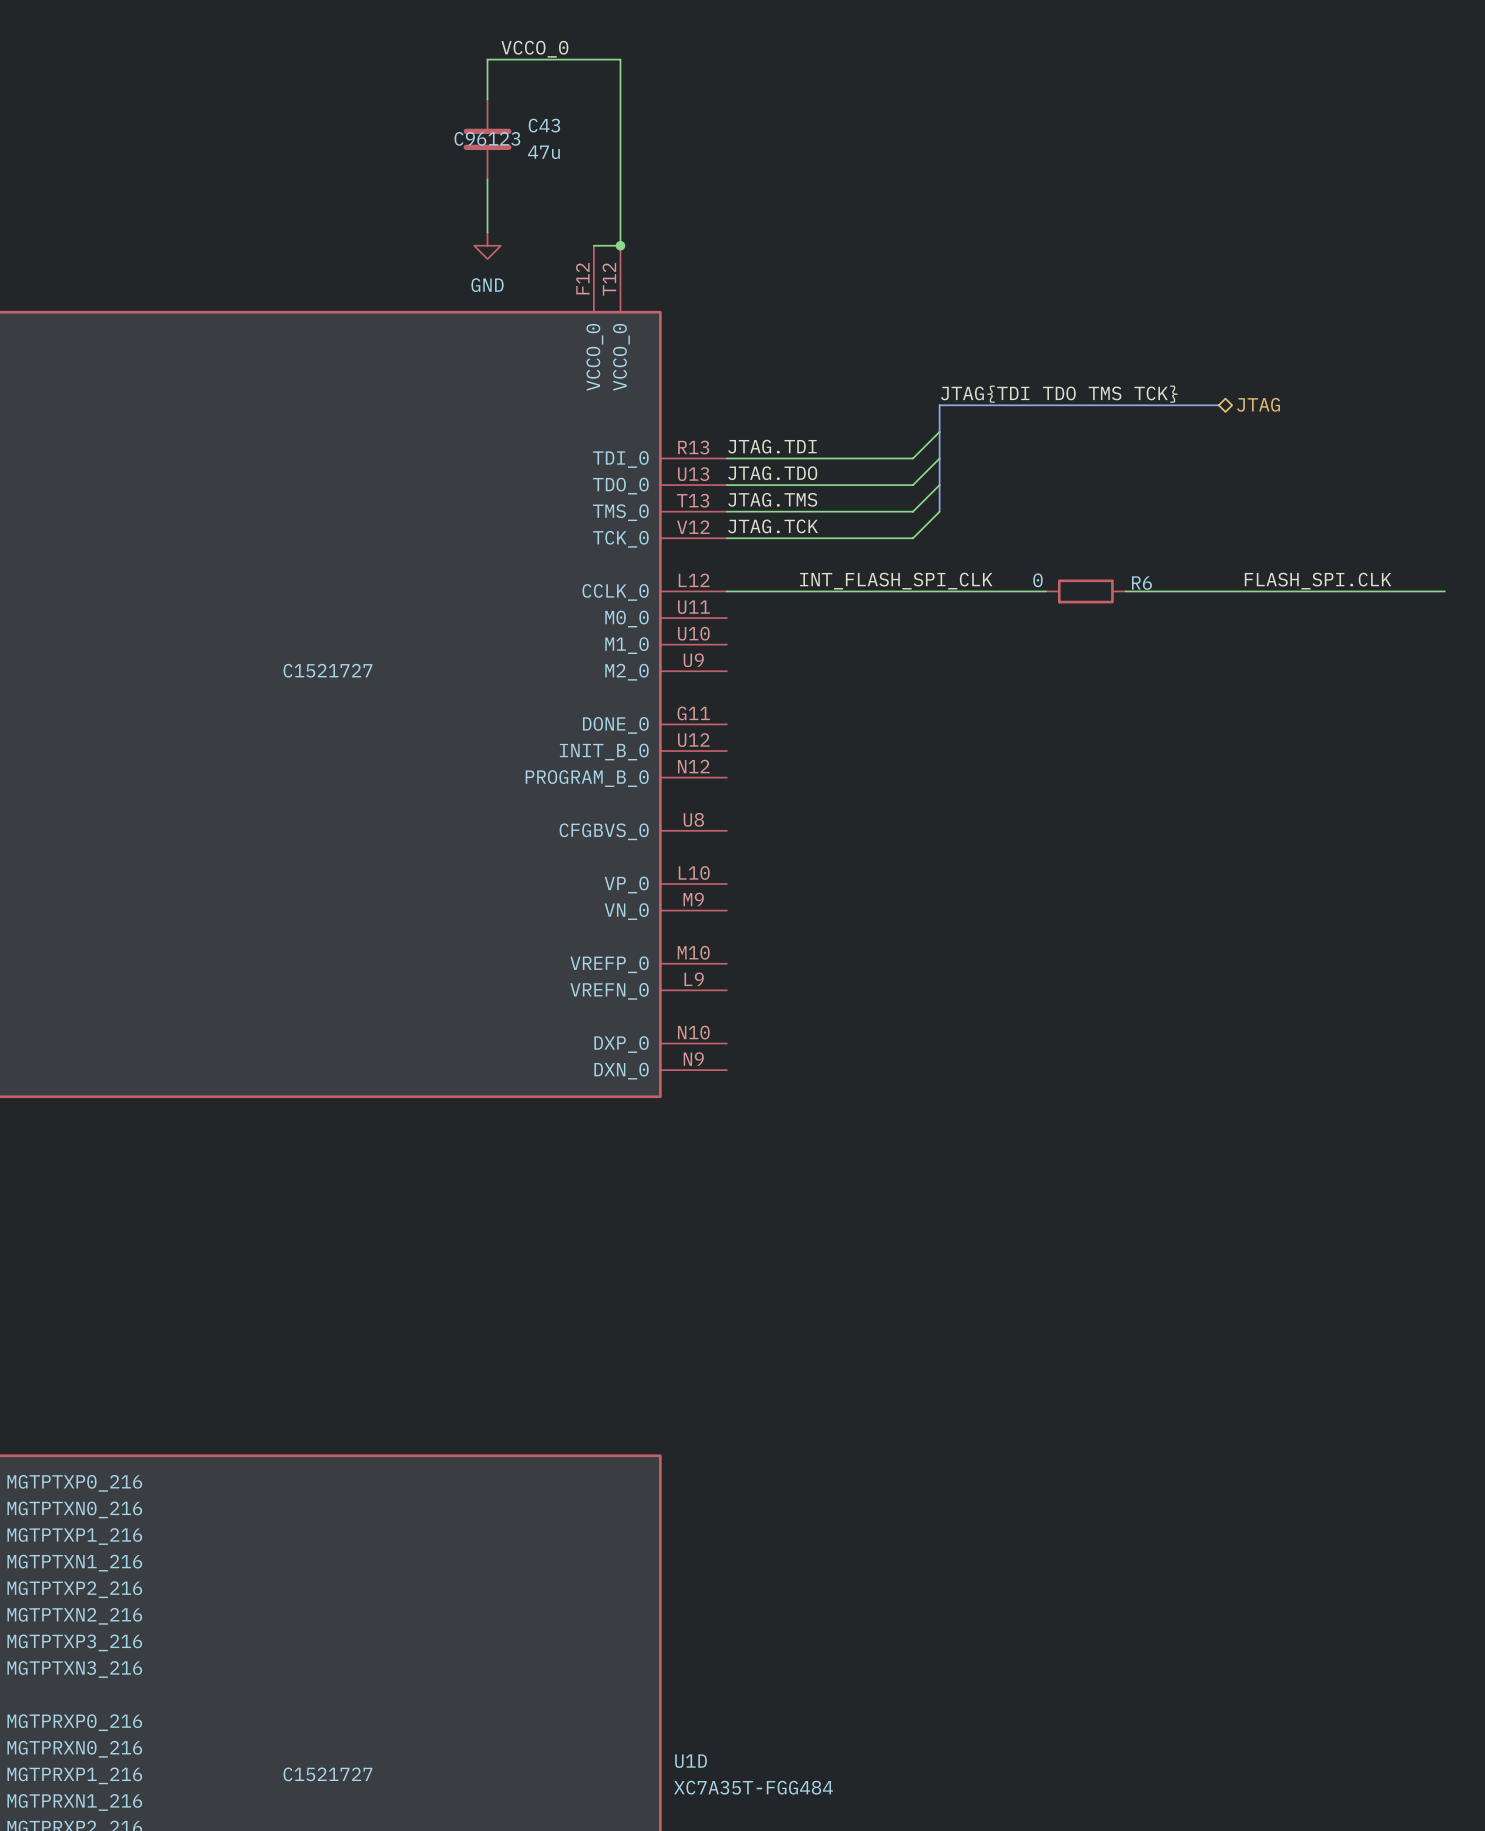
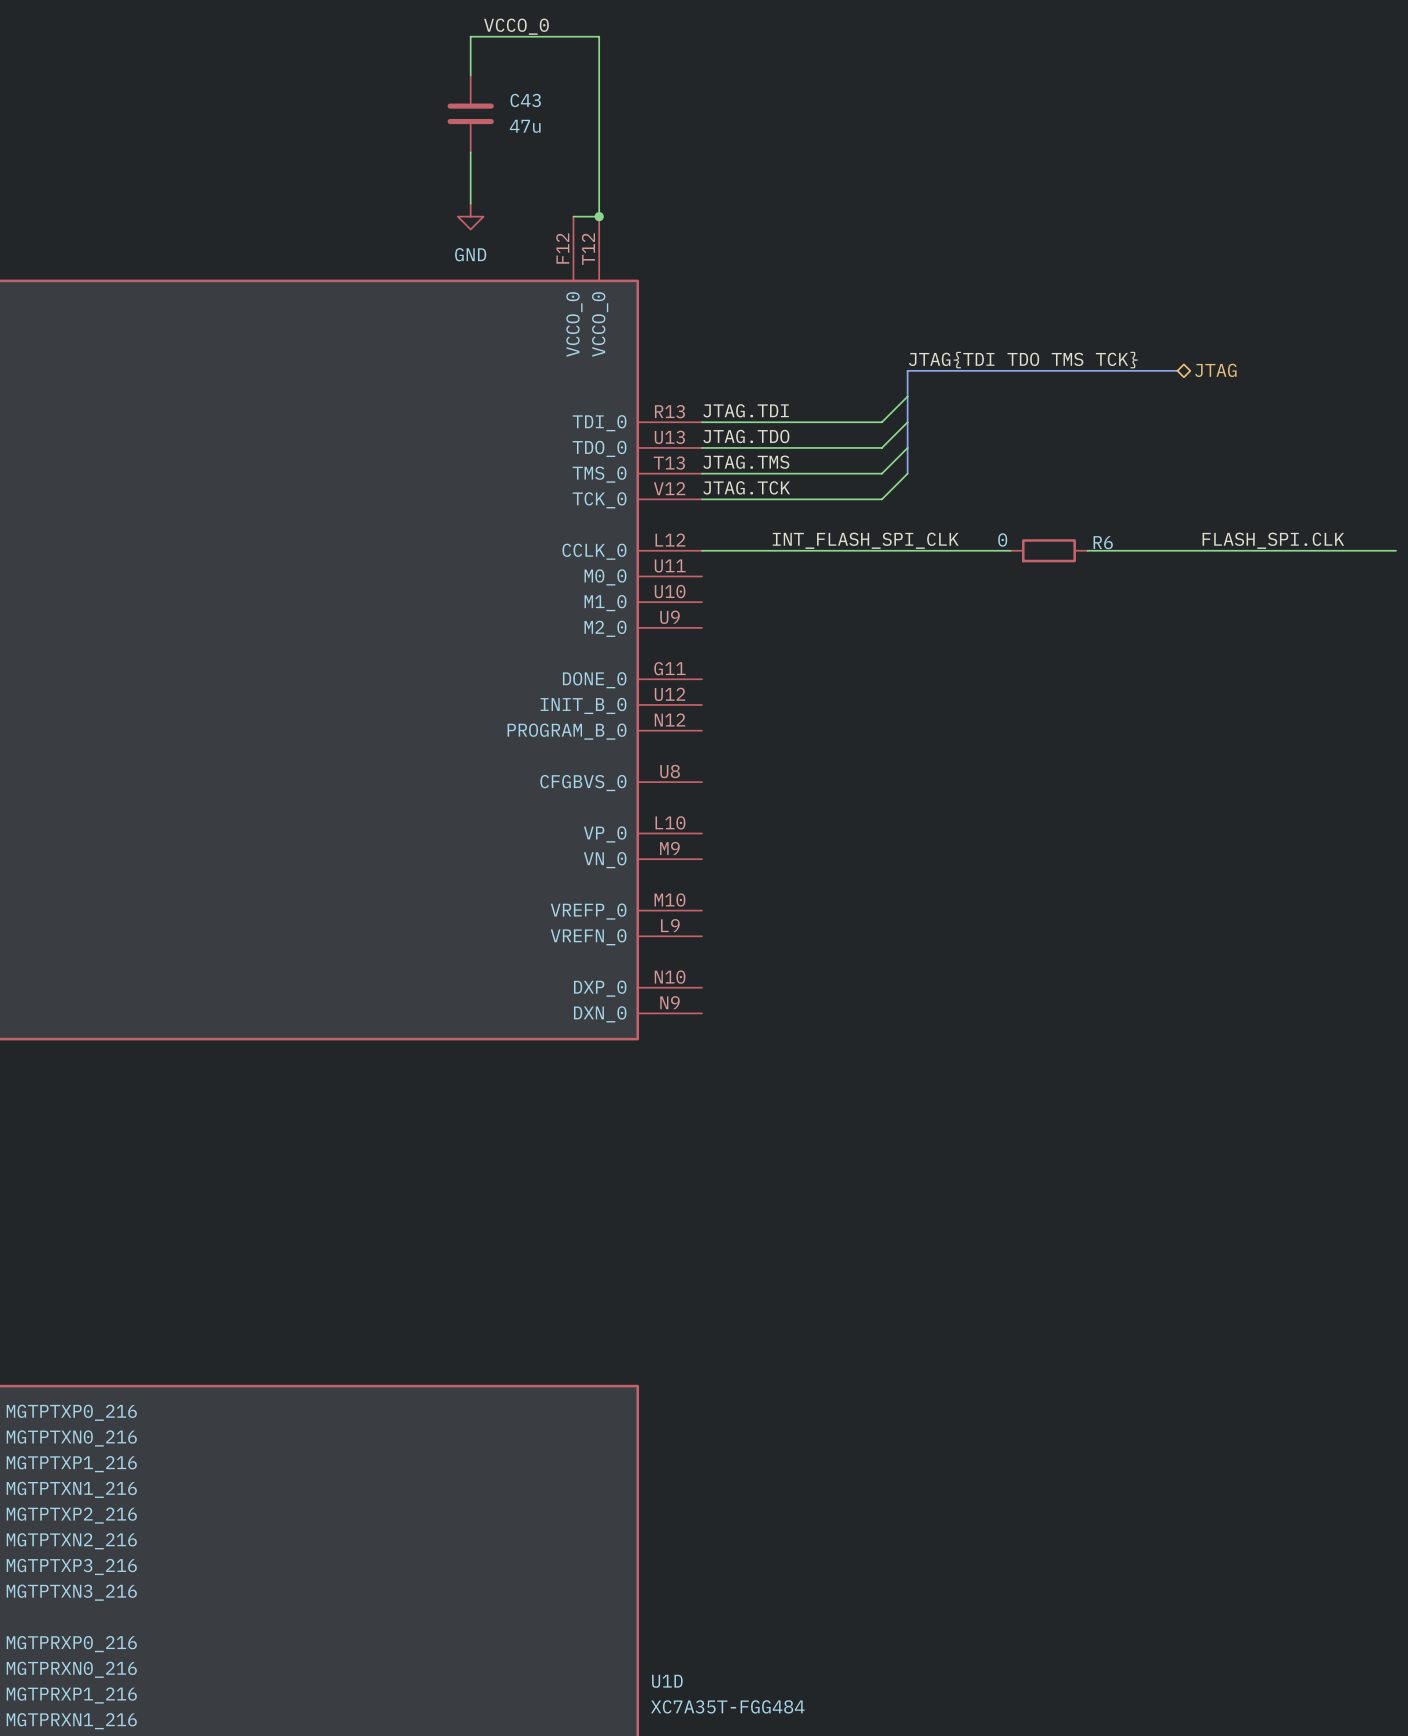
C43 text: C96123 (487, 138) -> none
part text: C1521727 (327, 670) -> none
U1D text: C1521727 (327, 1774) -> none

